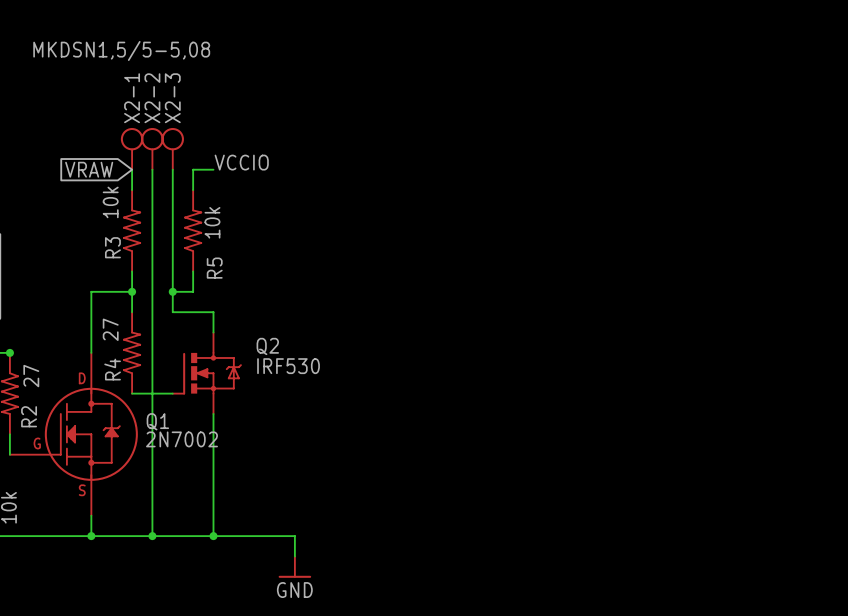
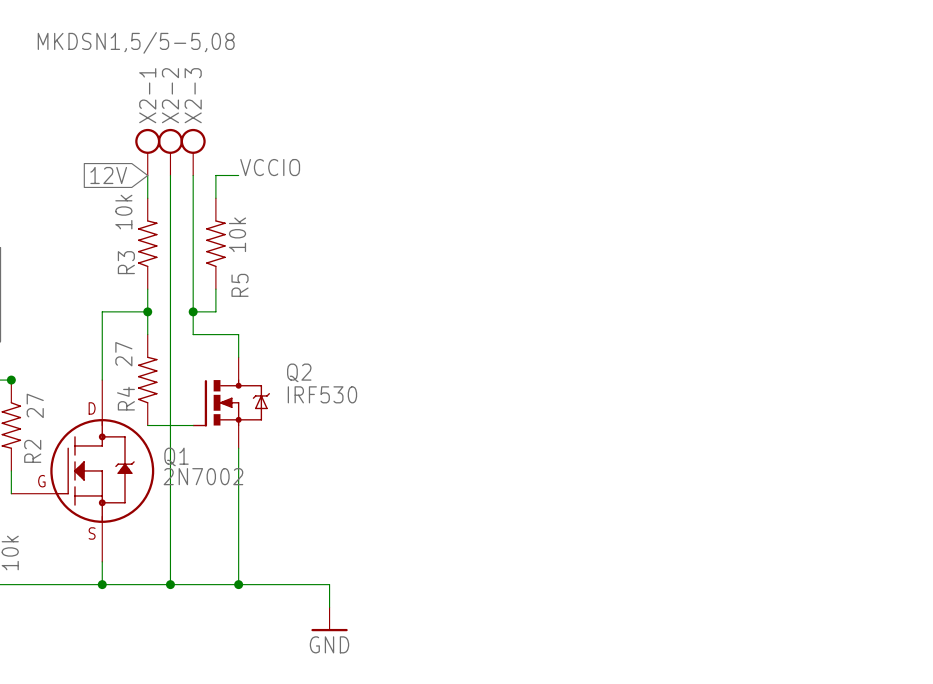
global label: VRAW (89, 169) -> 12V (108, 175)

